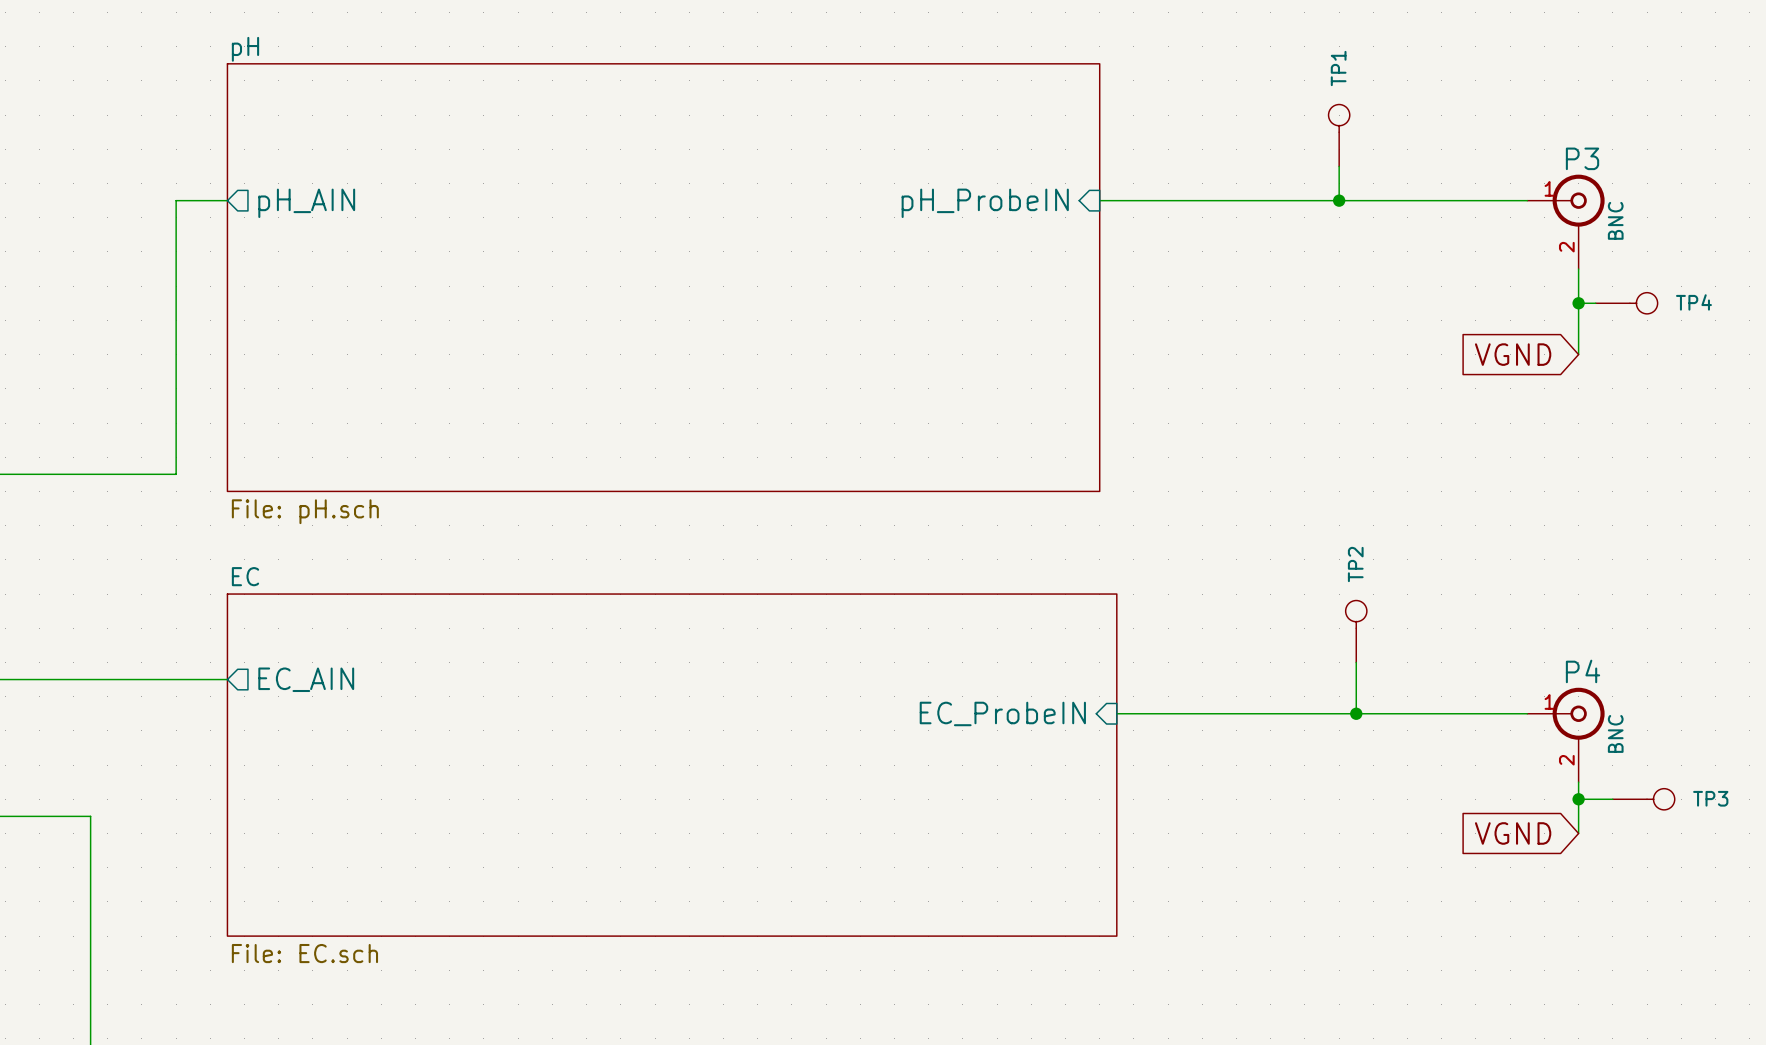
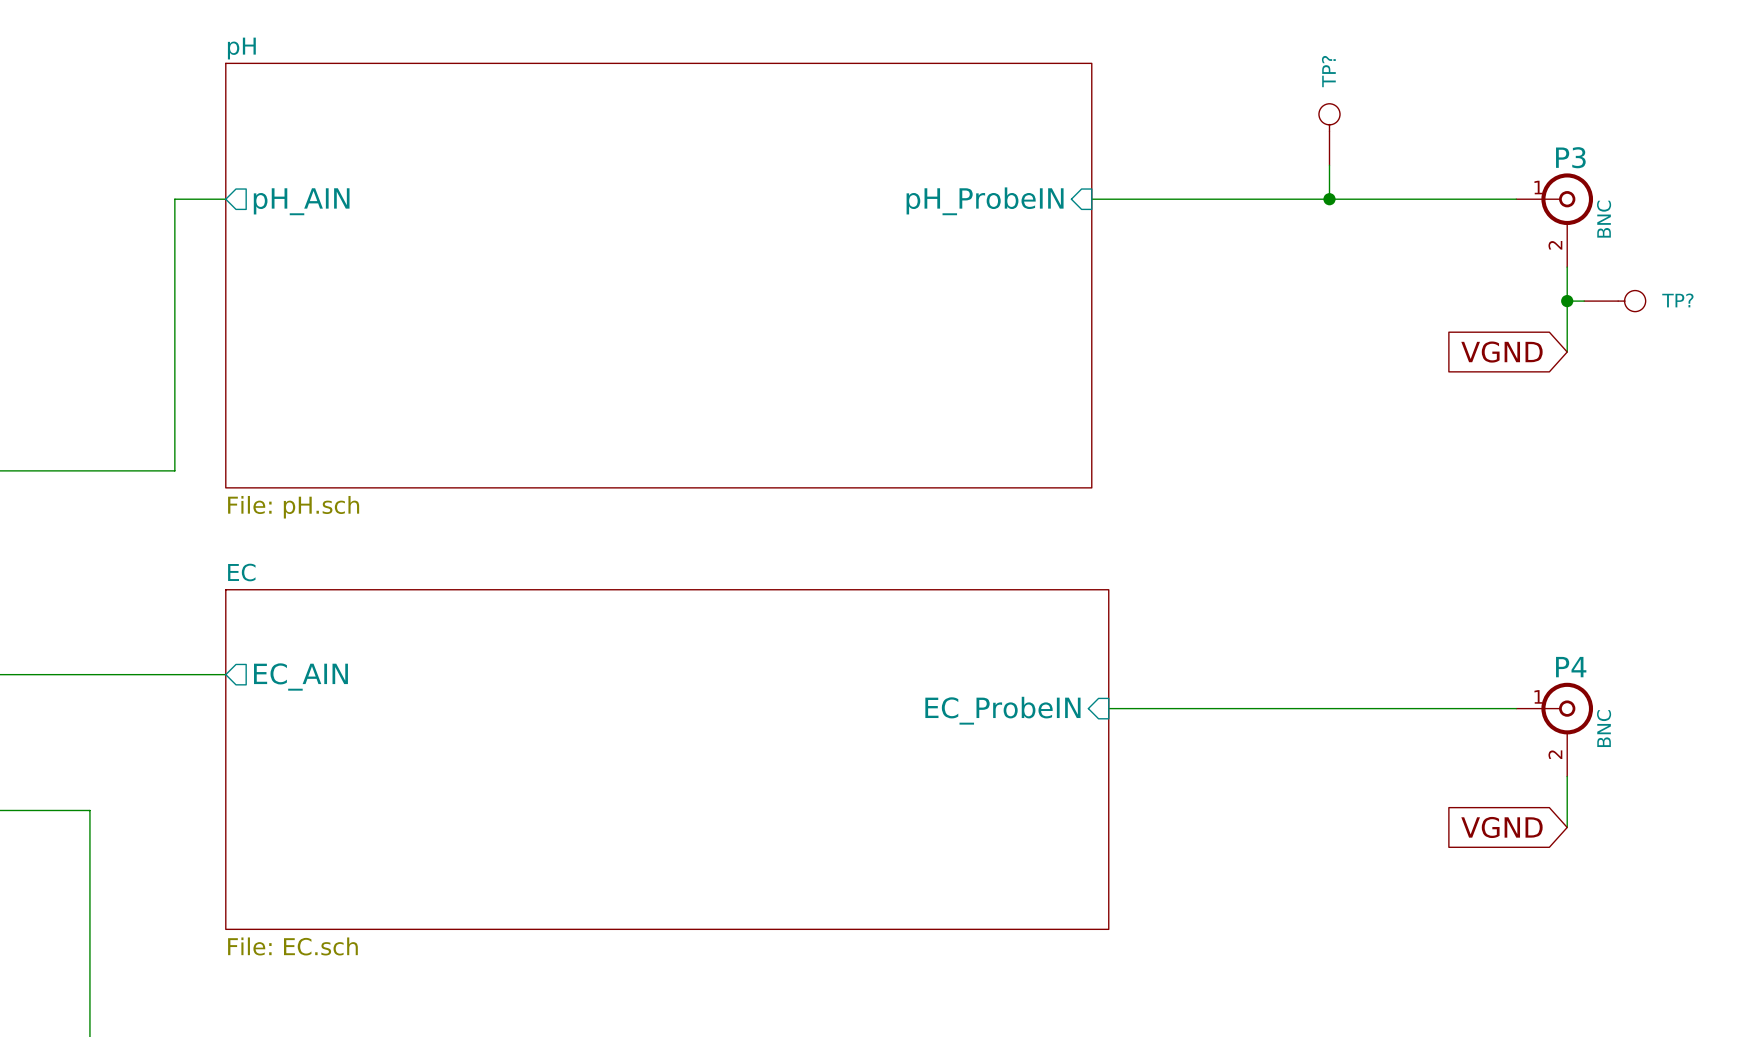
TP1 name: TP1 (1338, 68) -> TP? (1328, 71)
TP4 name: TP4 (1693, 302) -> TP? (1677, 300)
TP2: (1356, 631) -> none
wire: (1356, 662) (1356, 713) -> none
junction: (1356, 713) -> none
wire: (1578, 799) (1612, 799) -> none
junction: (1578, 799) -> none
TP3: (1643, 799) -> none

